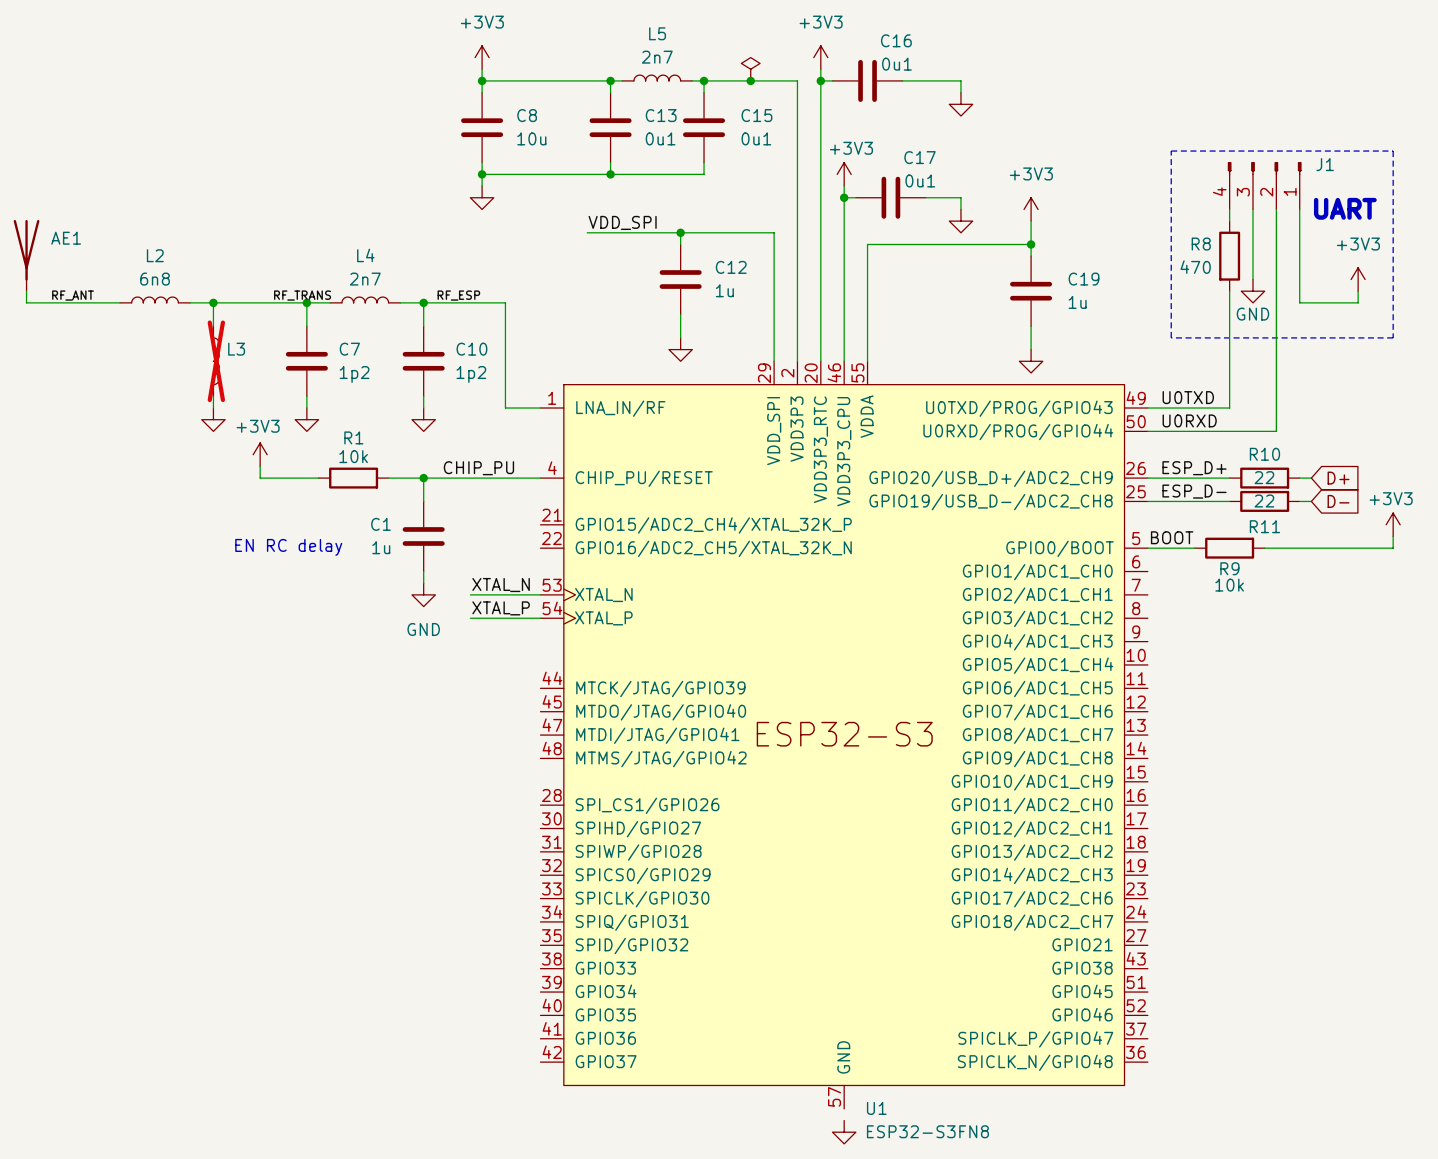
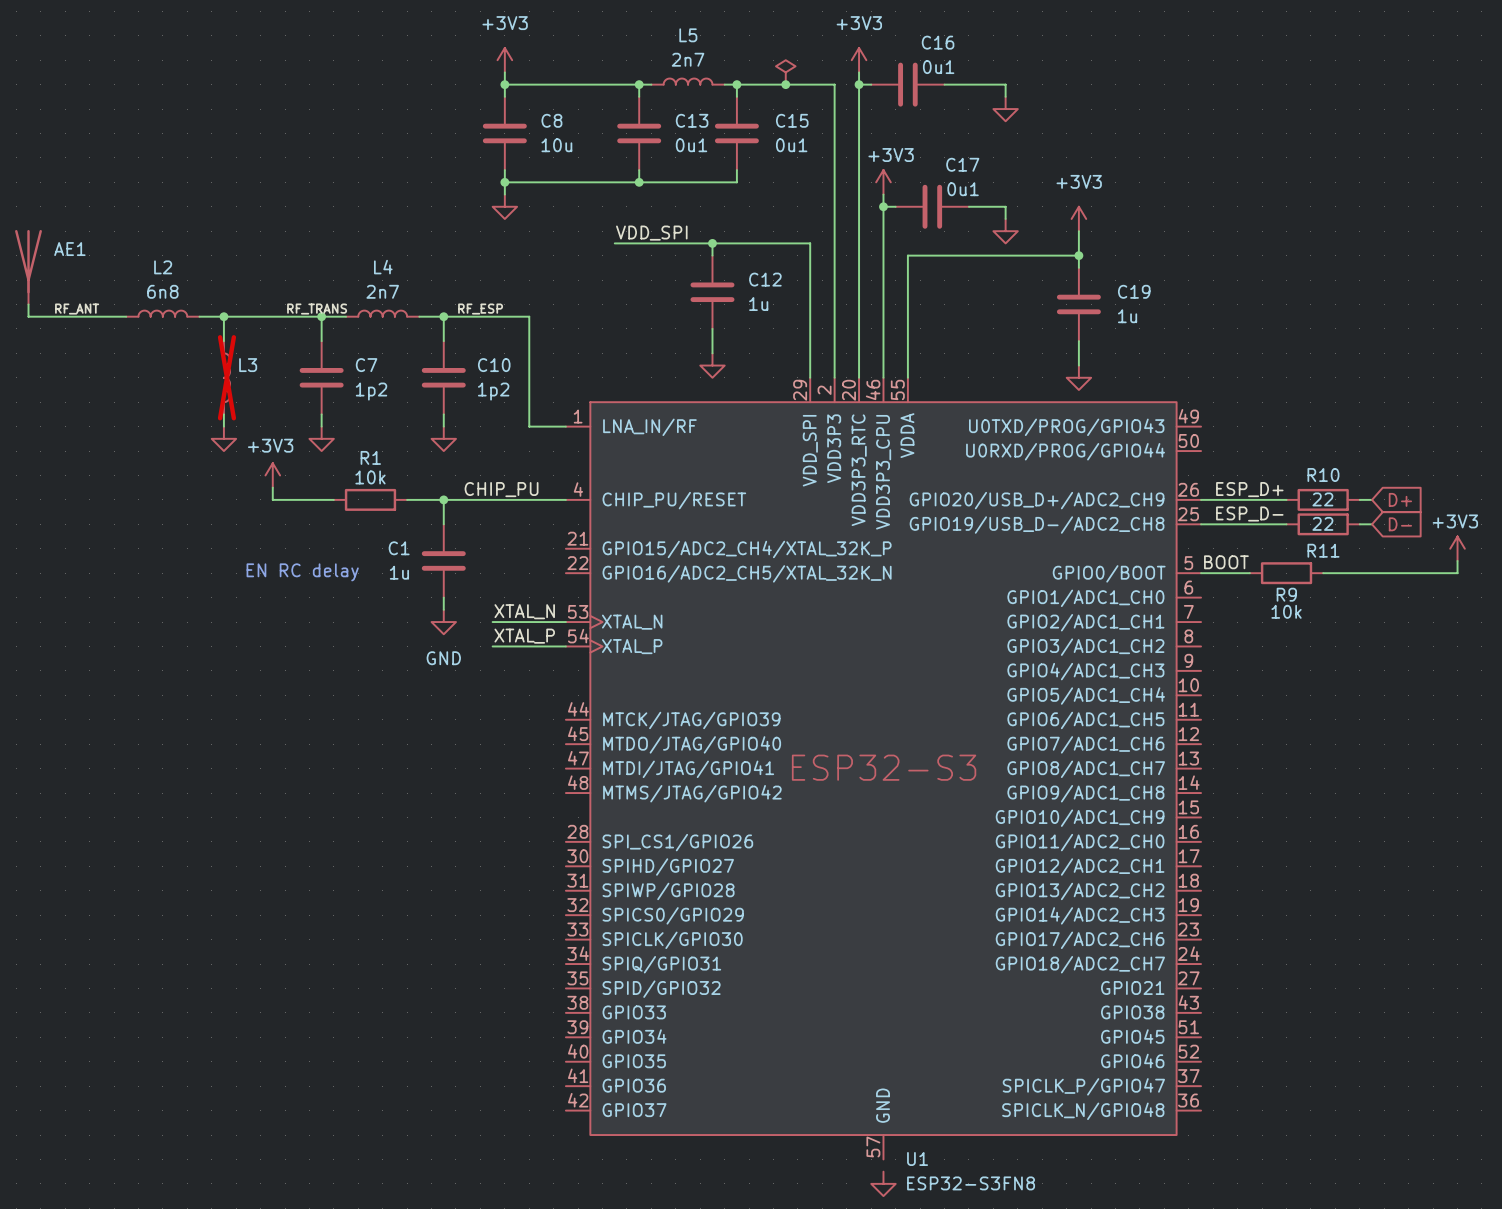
line: (1171, 151) (1393, 151) (1393, 337) (1171, 337) (1171, 151) -> none
J1: (1264, 185) -> none
text: UART (1345, 208) -> none
wire: (1229, 209) (1229, 221) -> none
wire: (1253, 209) (1253, 279) -> none
wire: (1276, 209) (1276, 431) (1147, 431) -> none
wire: (1299, 209) (1299, 302) (1358, 302) (1358, 291) -> none
R8: 470 (1229, 256) -> none
power symbol: +3V3 (1358, 279) -> none
wire: (1229, 291) (1229, 408) (1147, 408) -> none
power symbol: GND (1253, 291) -> none
label: U0TXD (1188, 397) -> none
label: U0RXD (1189, 420) -> none

